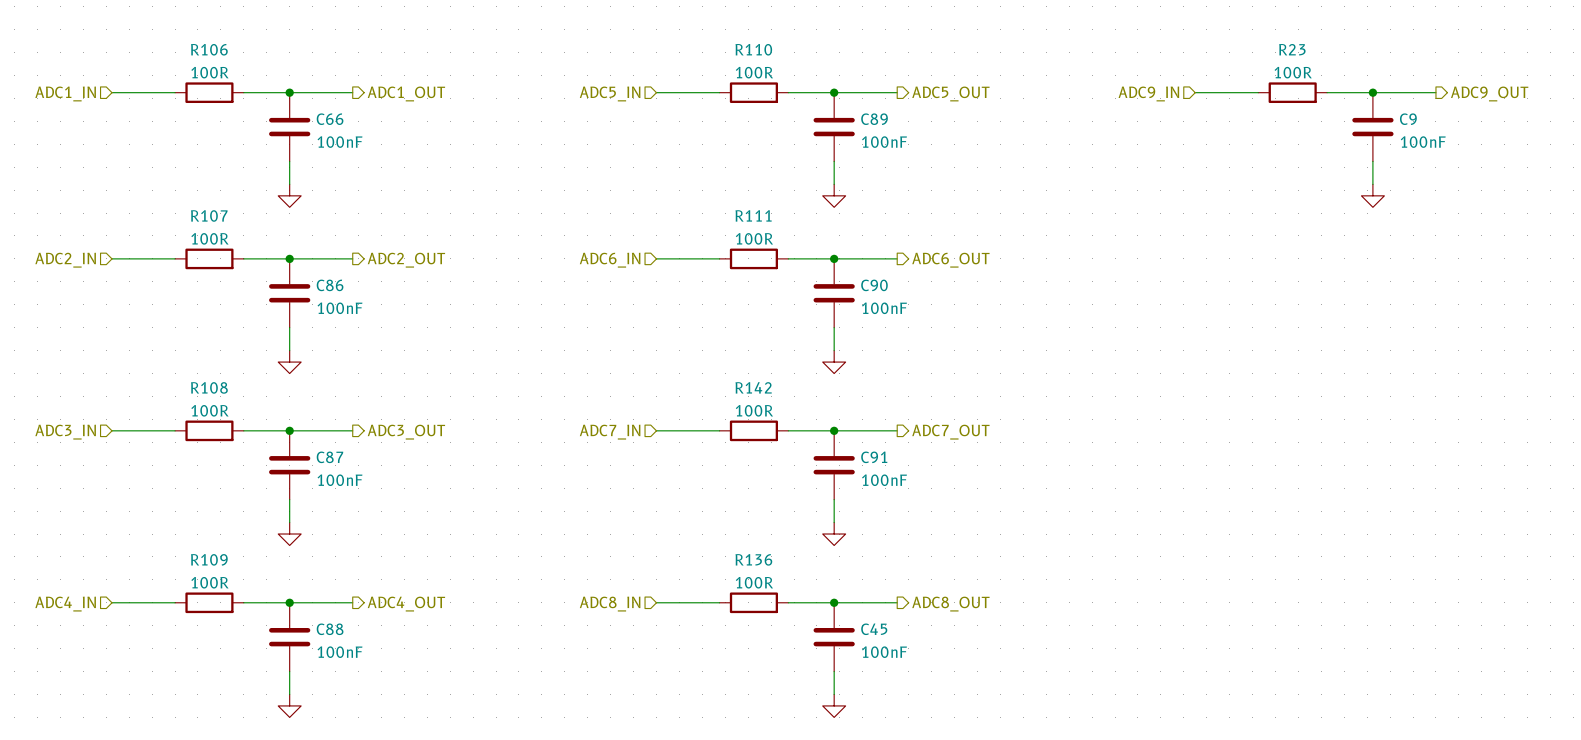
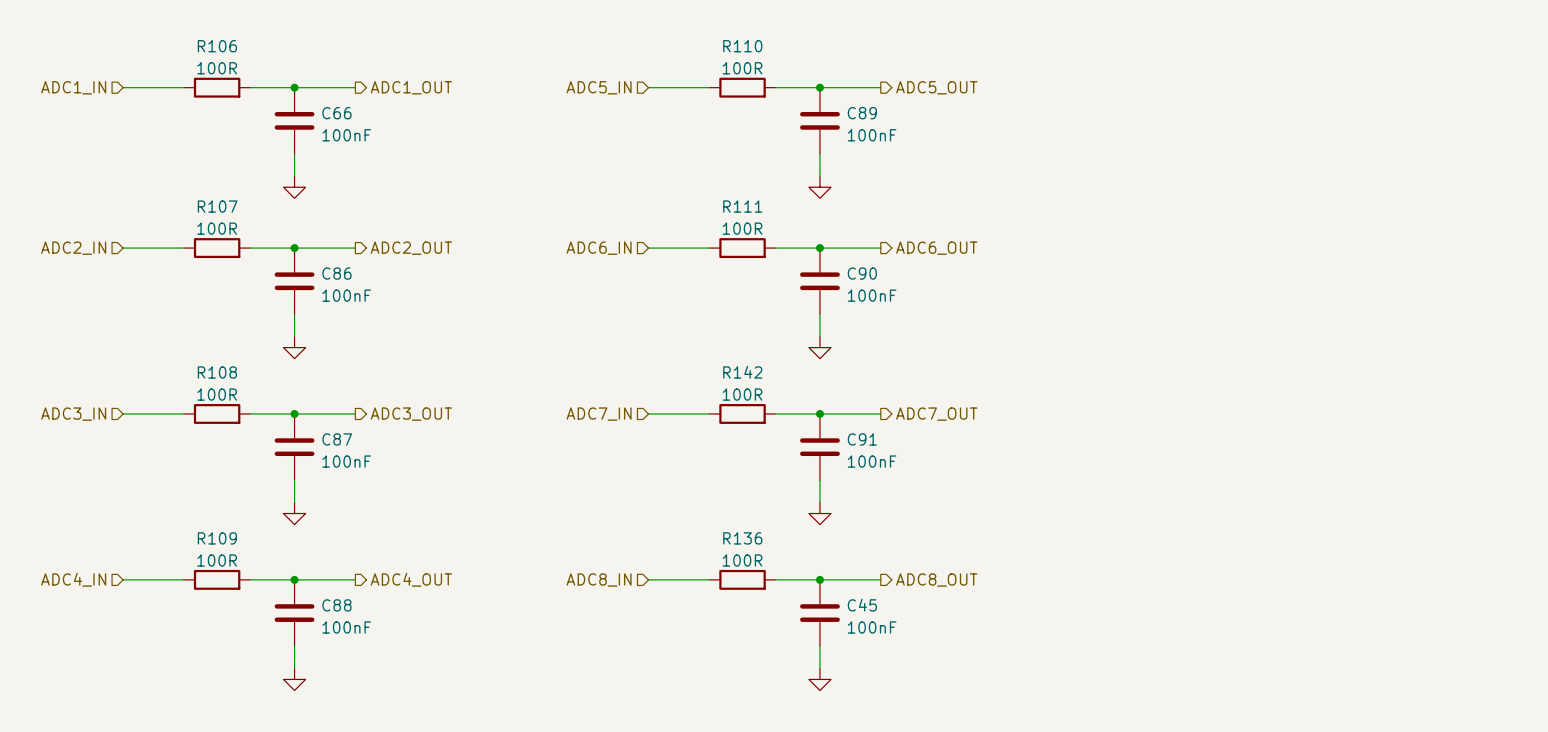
wire: (1195, 92) (1258, 92) -> none
R23: 100R (1292, 92) -> none
wire: (1327, 92) (1435, 92) -> none
junction: (1372, 92) -> none
hierarchical label: ADC9_IN (1148, 93) -> none
hierarchical label: ADC9_OUT (1489, 93) -> none
C9: 100nF (1372, 127) -> none
wire: (1372, 161) (1372, 184) -> none
power symbol: (1372, 195) -> none

